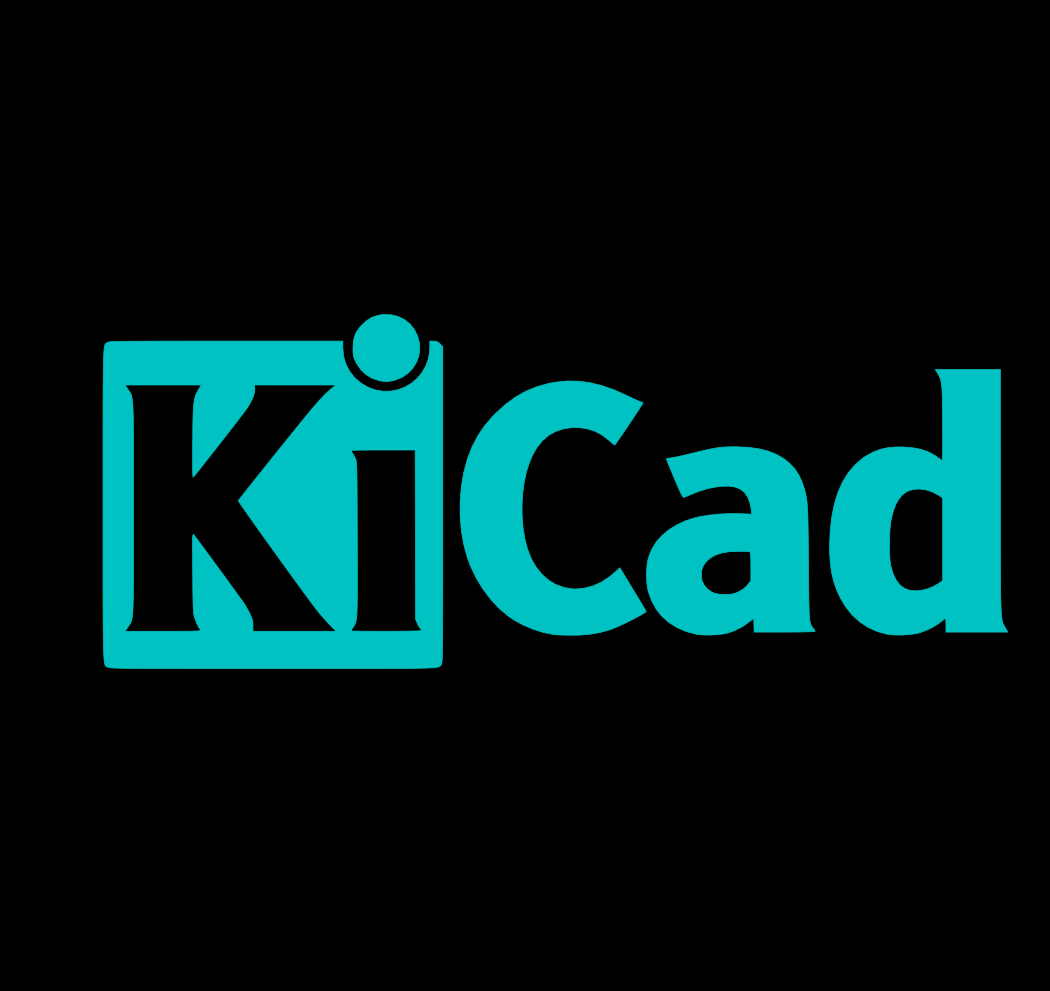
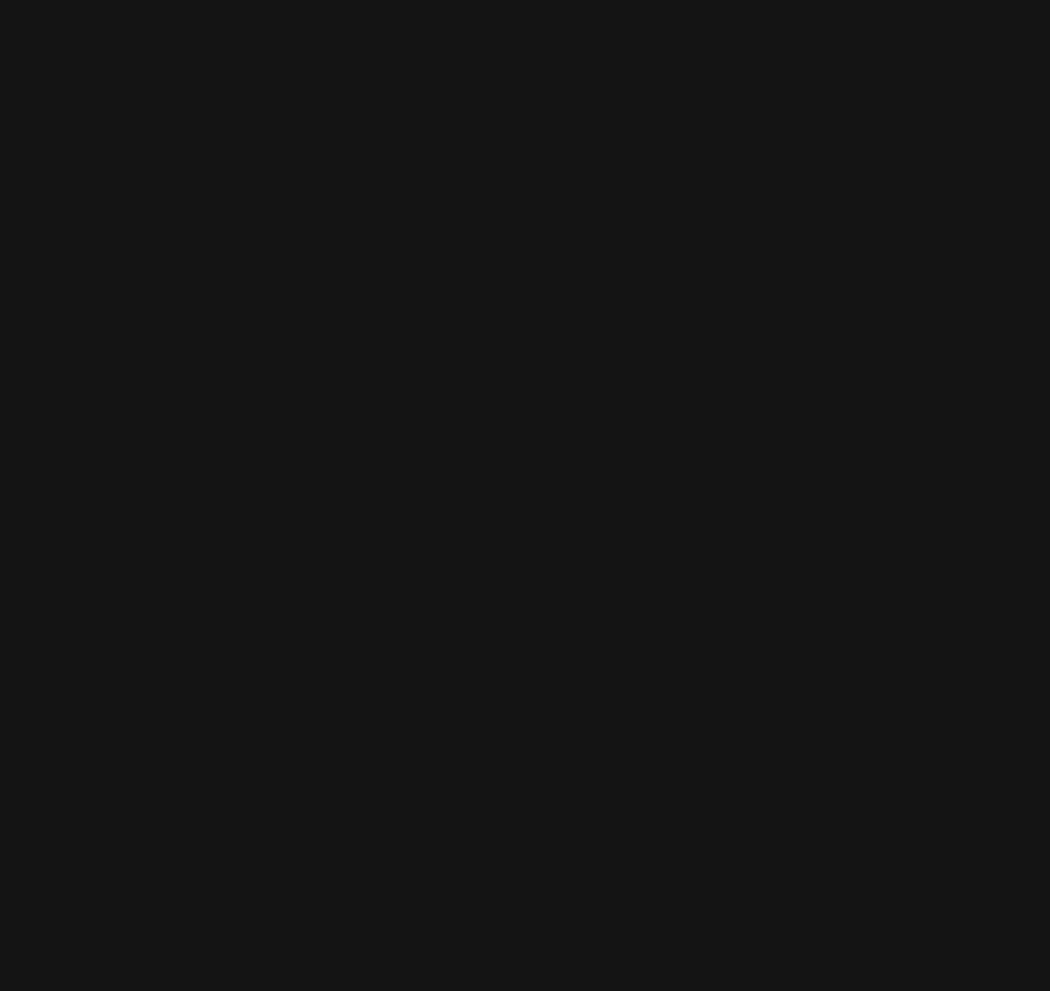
drawing: [102, 314, 1009, 670] -> none

